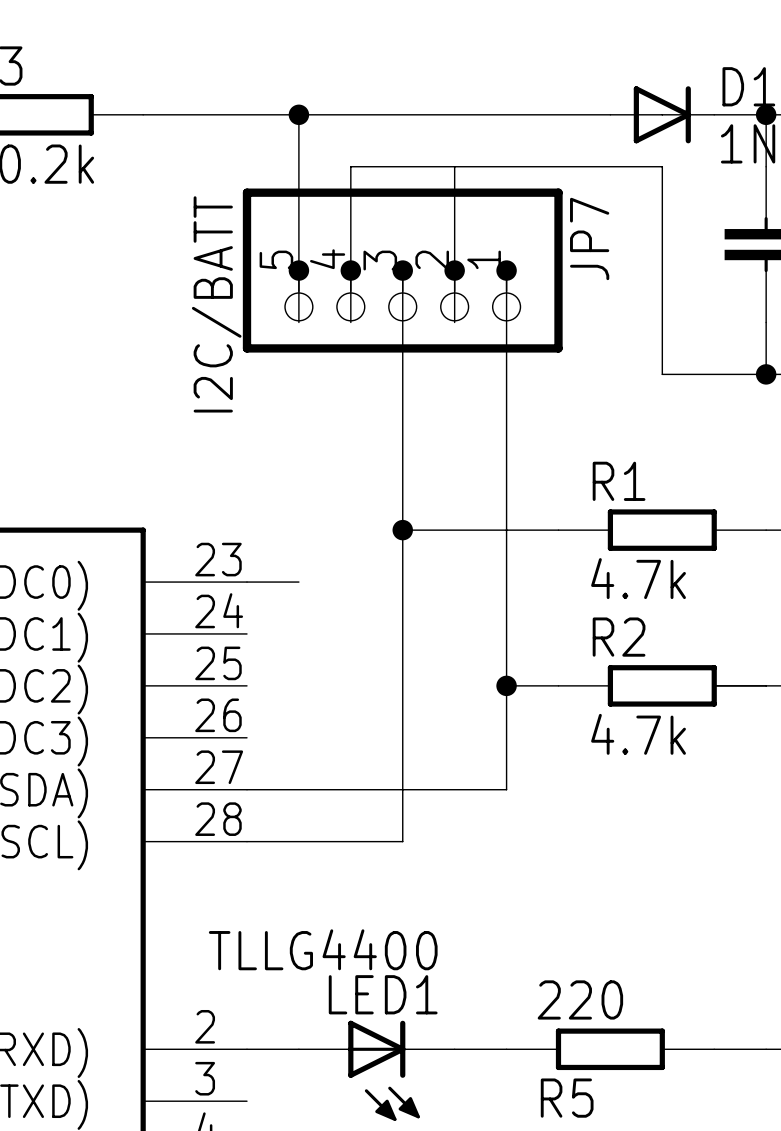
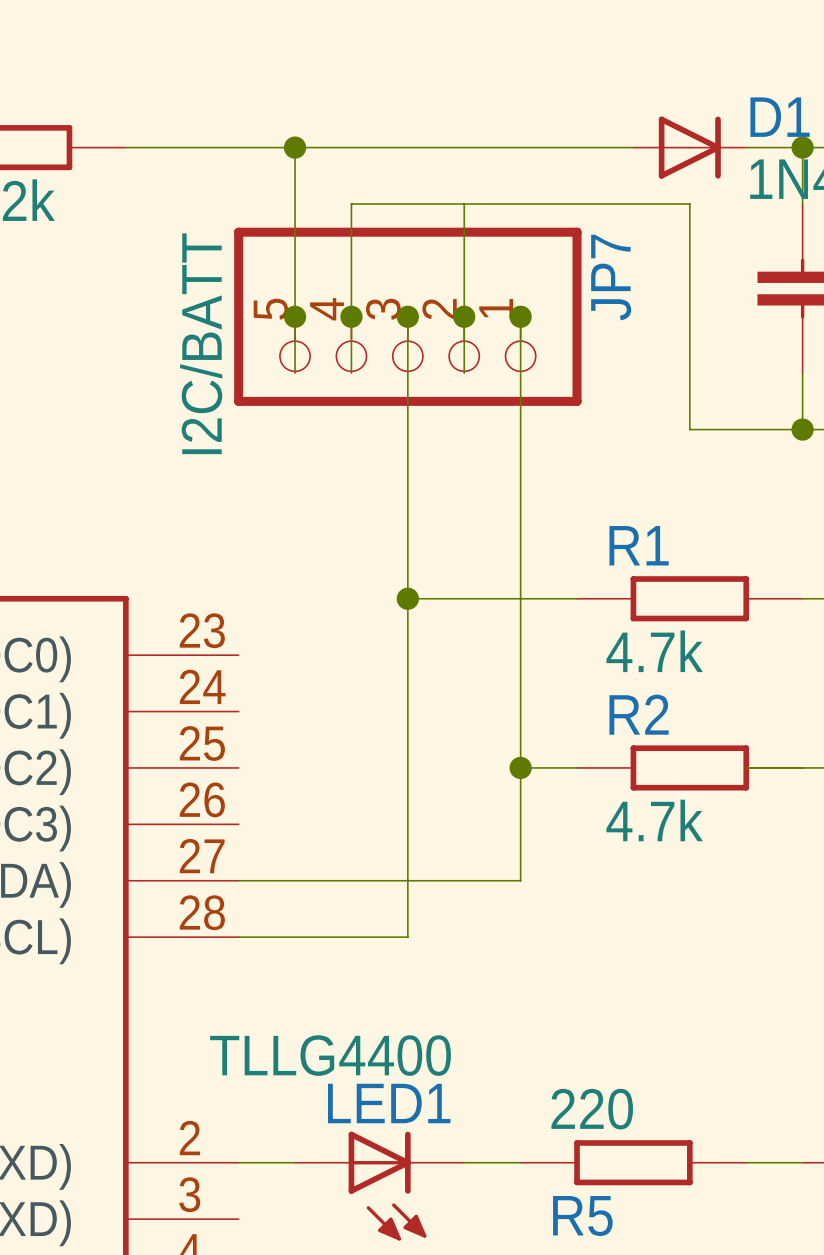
wire: (247, 582) (298, 582) -> none

